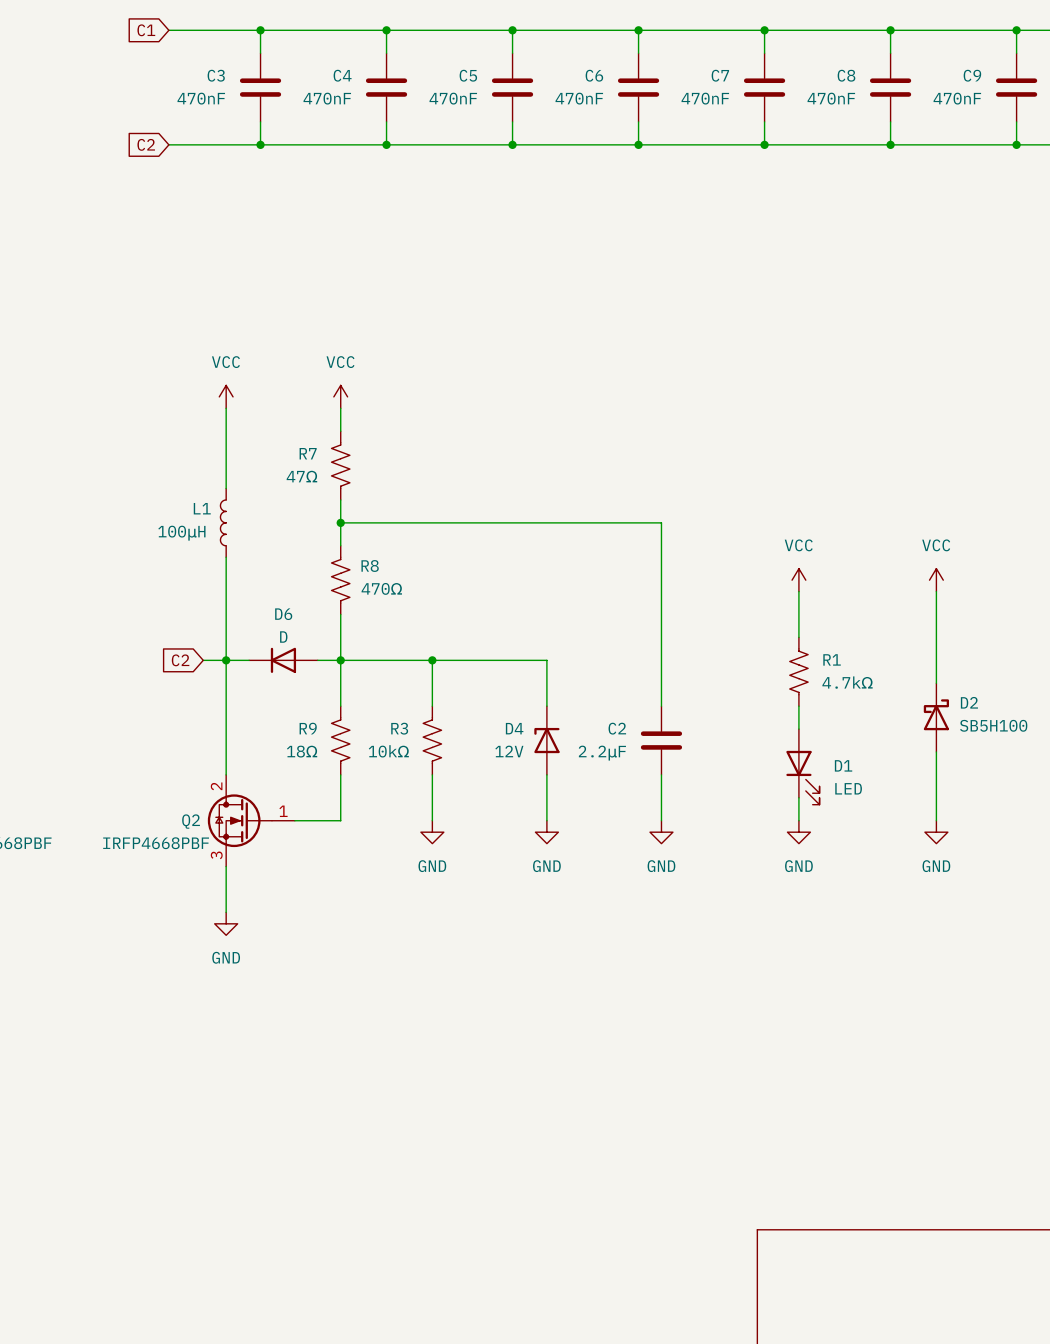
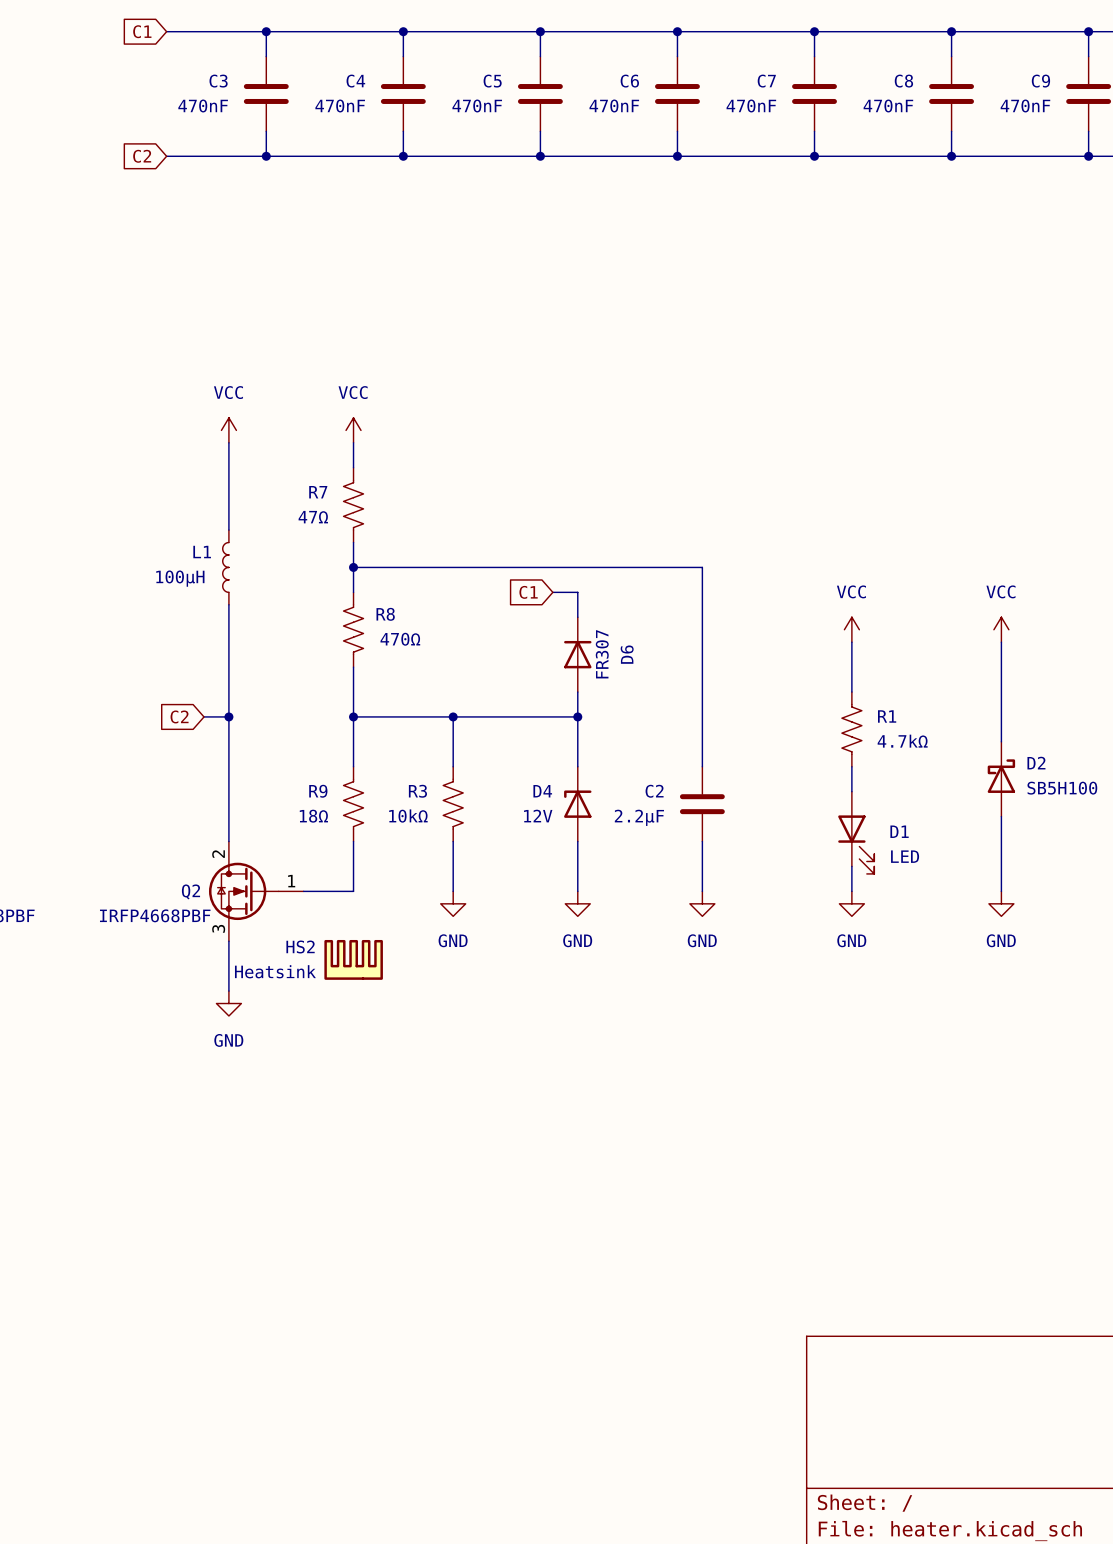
global label: none -> C1 (528, 592)
wire: none -> (552, 592) (577, 592) (577, 617)
D6 value: D (283, 637) -> FR307 (602, 654)
wire: none -> (577, 692) (577, 716)
wire: (226, 660) (249, 660) -> none
D6 rotation: 0° (283, 660) -> 90° clockwise (577, 654)
D6 position: (283, 660) -> (577, 654)
wire: (317, 660) (340, 660) -> none
junction: none -> (577, 716)
HS2: none -> Heatsink (353, 959)

